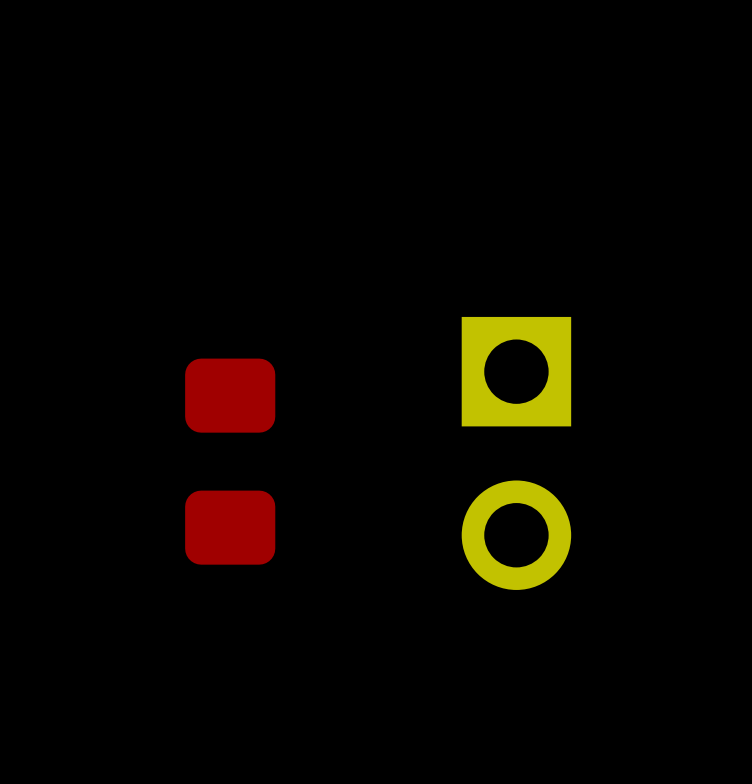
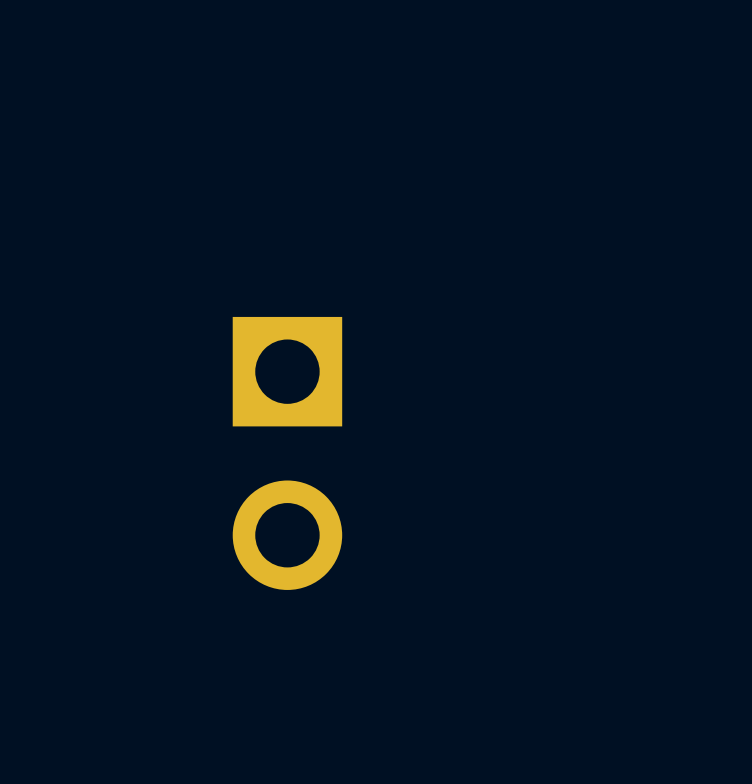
part footprint: [185, 358, 276, 565] -> [232, 316, 343, 590]
part: (516, 453) -> none

